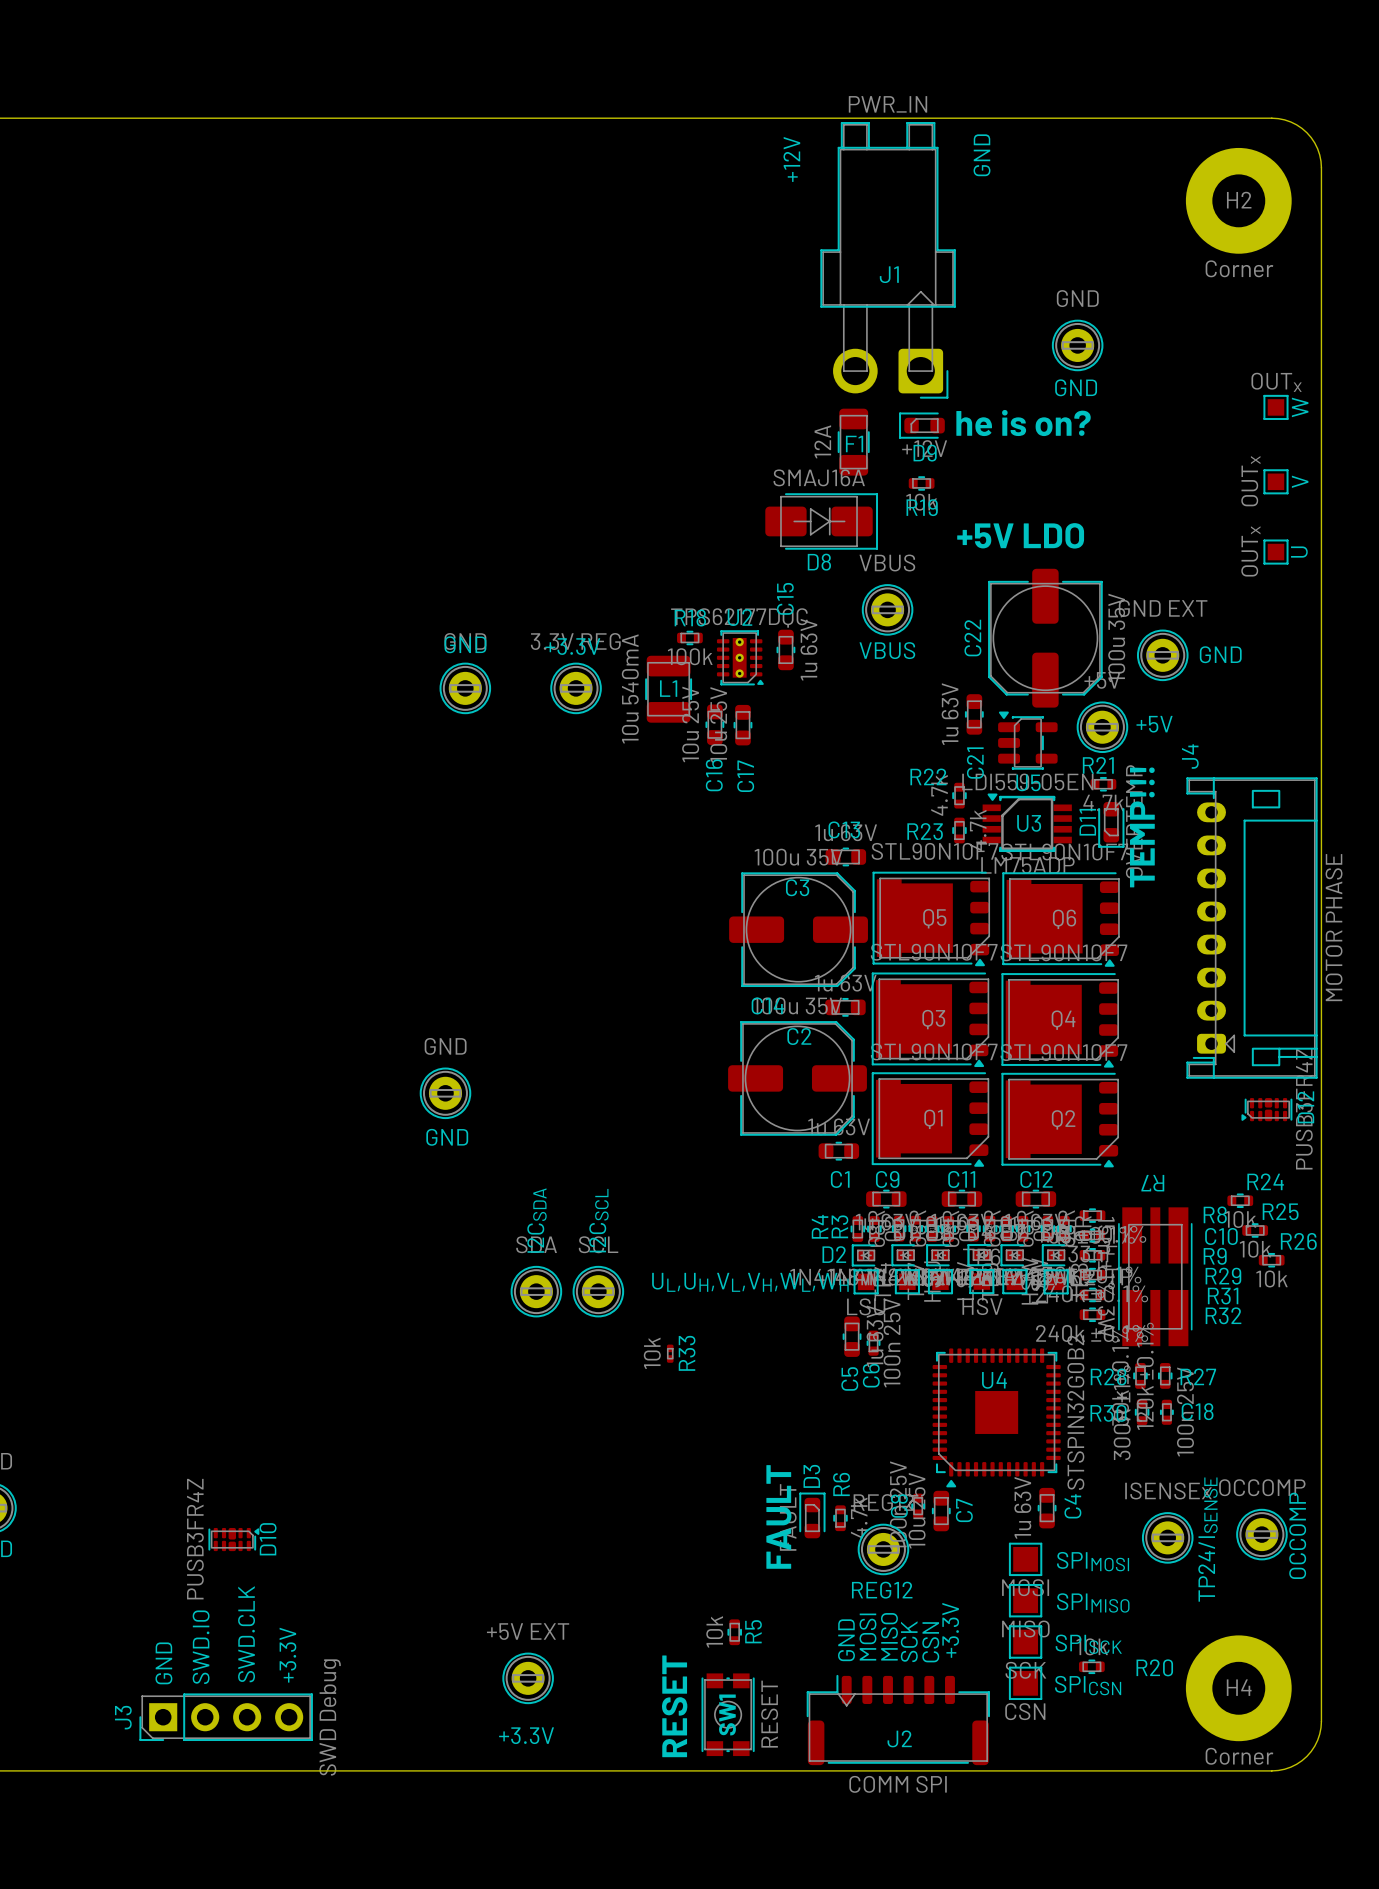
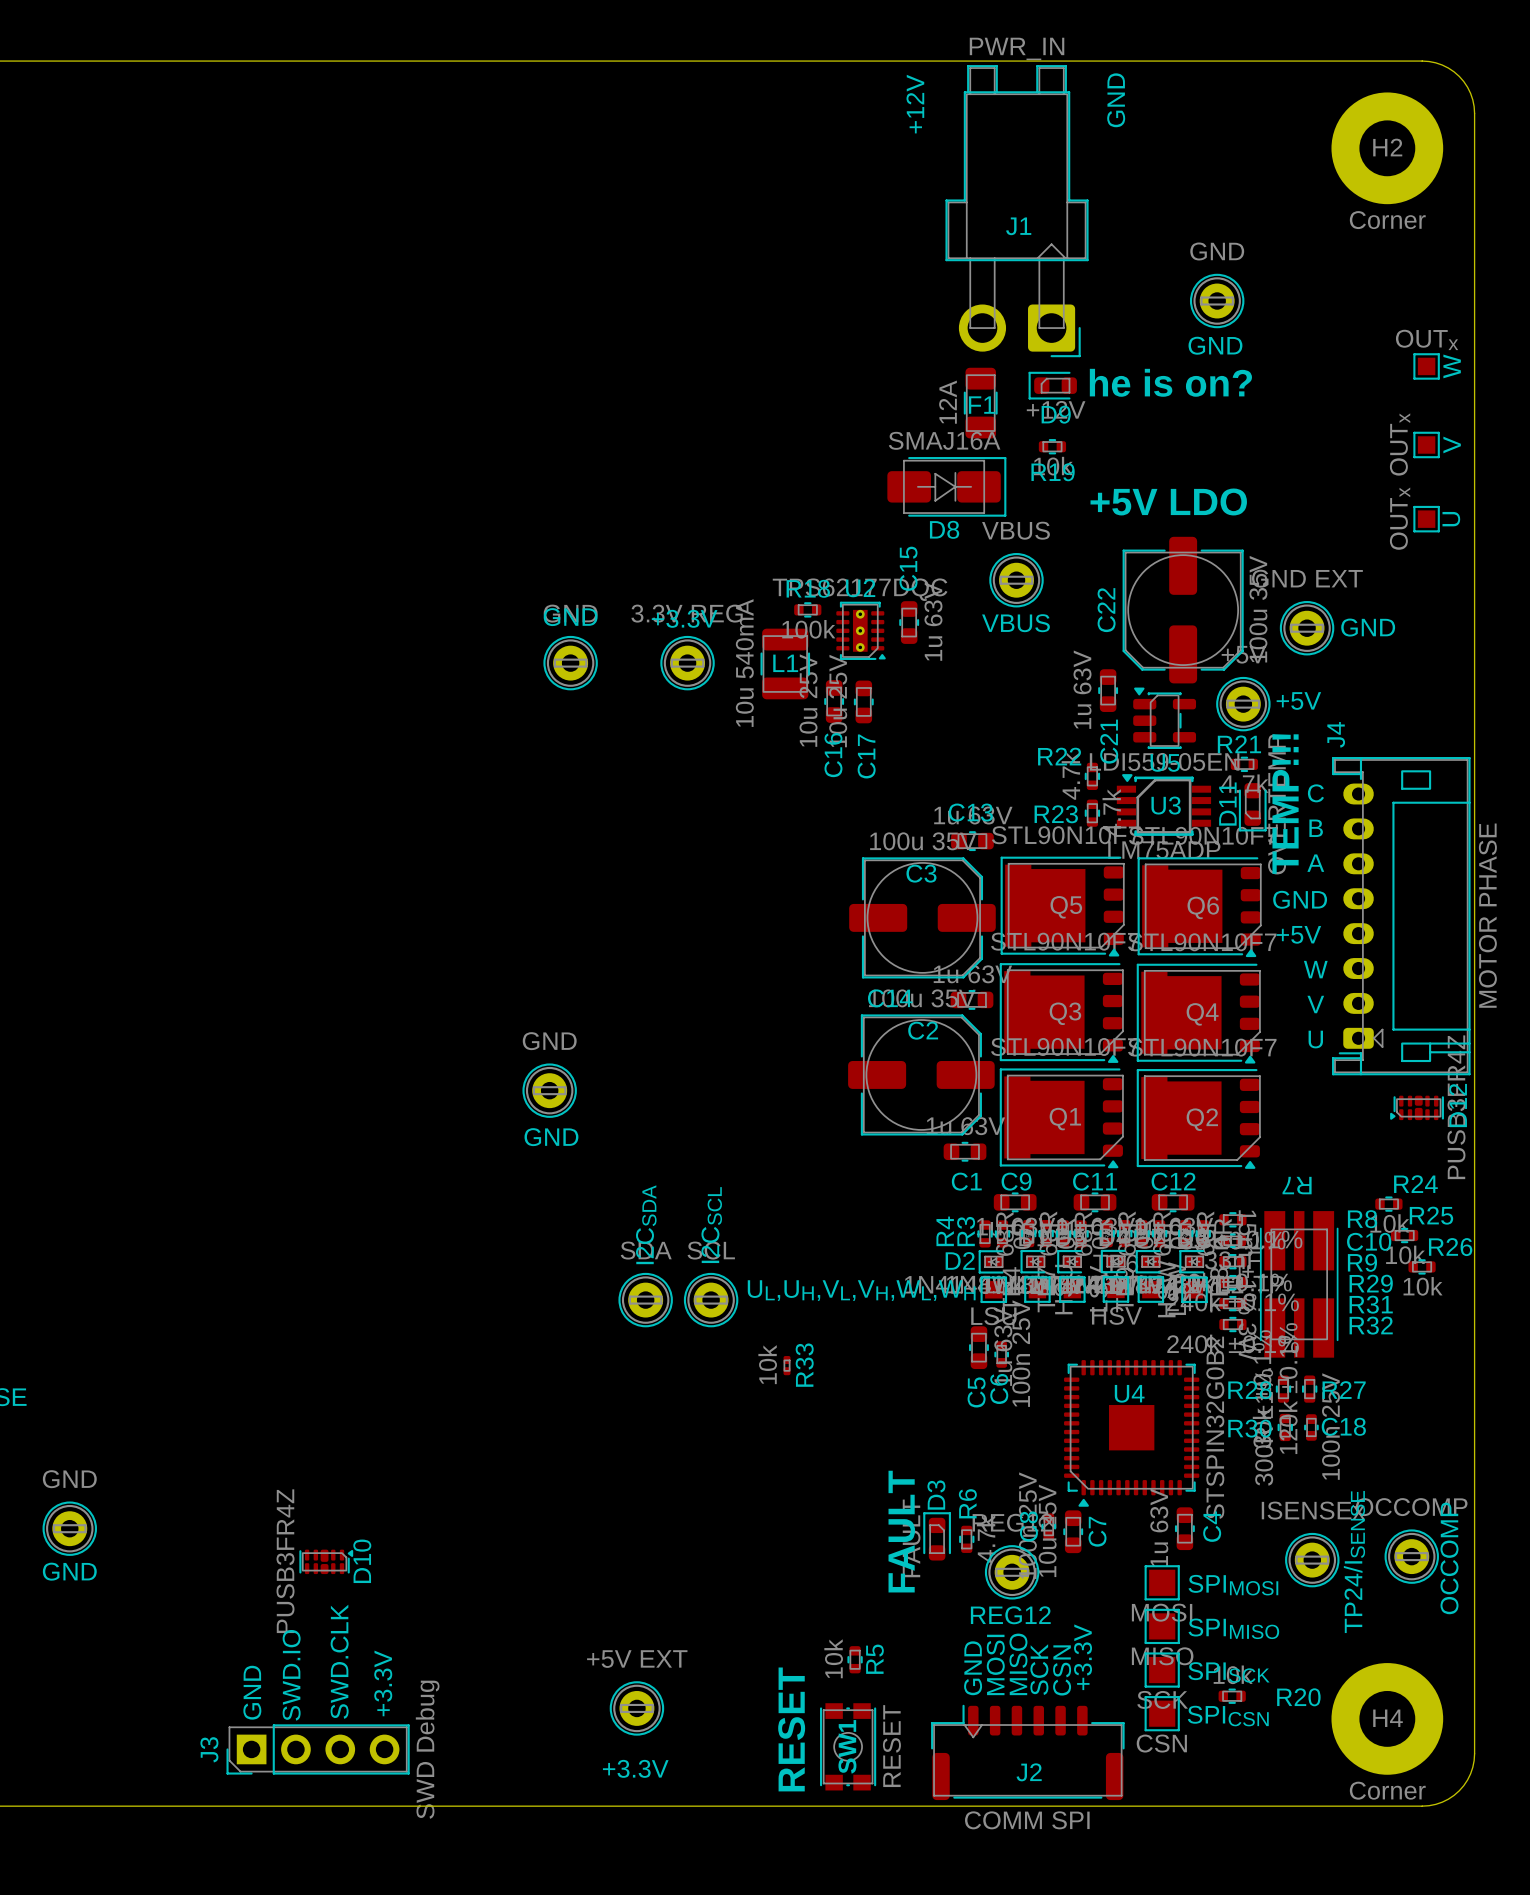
text: none -> C (1315, 793)
text: none -> B (1316, 828)
text: none -> A (1315, 863)
text: none -> GND (1300, 899)
text: none -> +5V (1298, 934)
text: none -> W (1315, 969)
text: none -> V (1315, 1004)
text: none -> U (1315, 1039)

